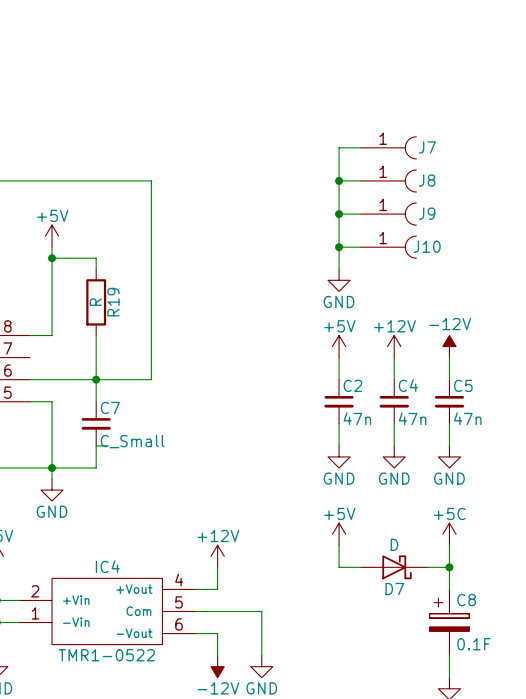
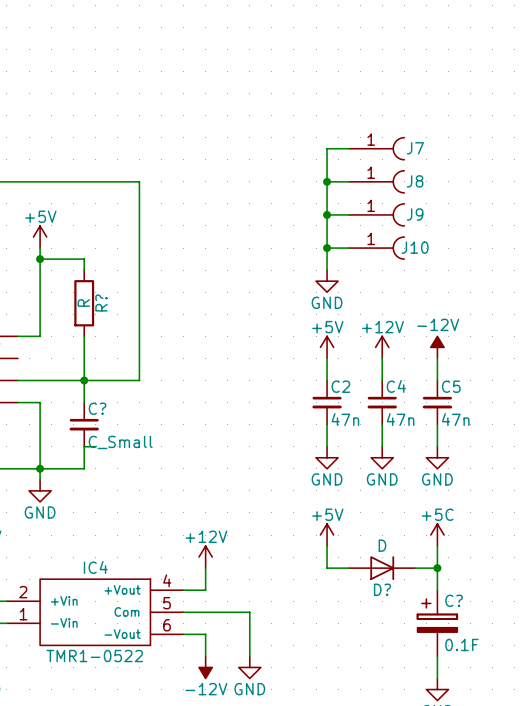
R19 name: R19 (113, 302) -> R? (101, 302)
C7 name: C7 (110, 407) -> C? (97, 408)
D7: D (394, 567) -> none
D?: none -> D (382, 568)
C8 name: C8 (466, 600) -> C? (454, 600)

